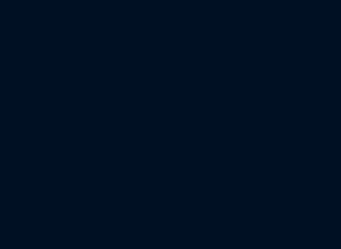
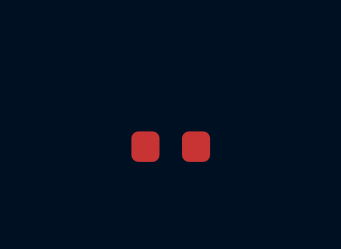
part: none -> (170, 146)

